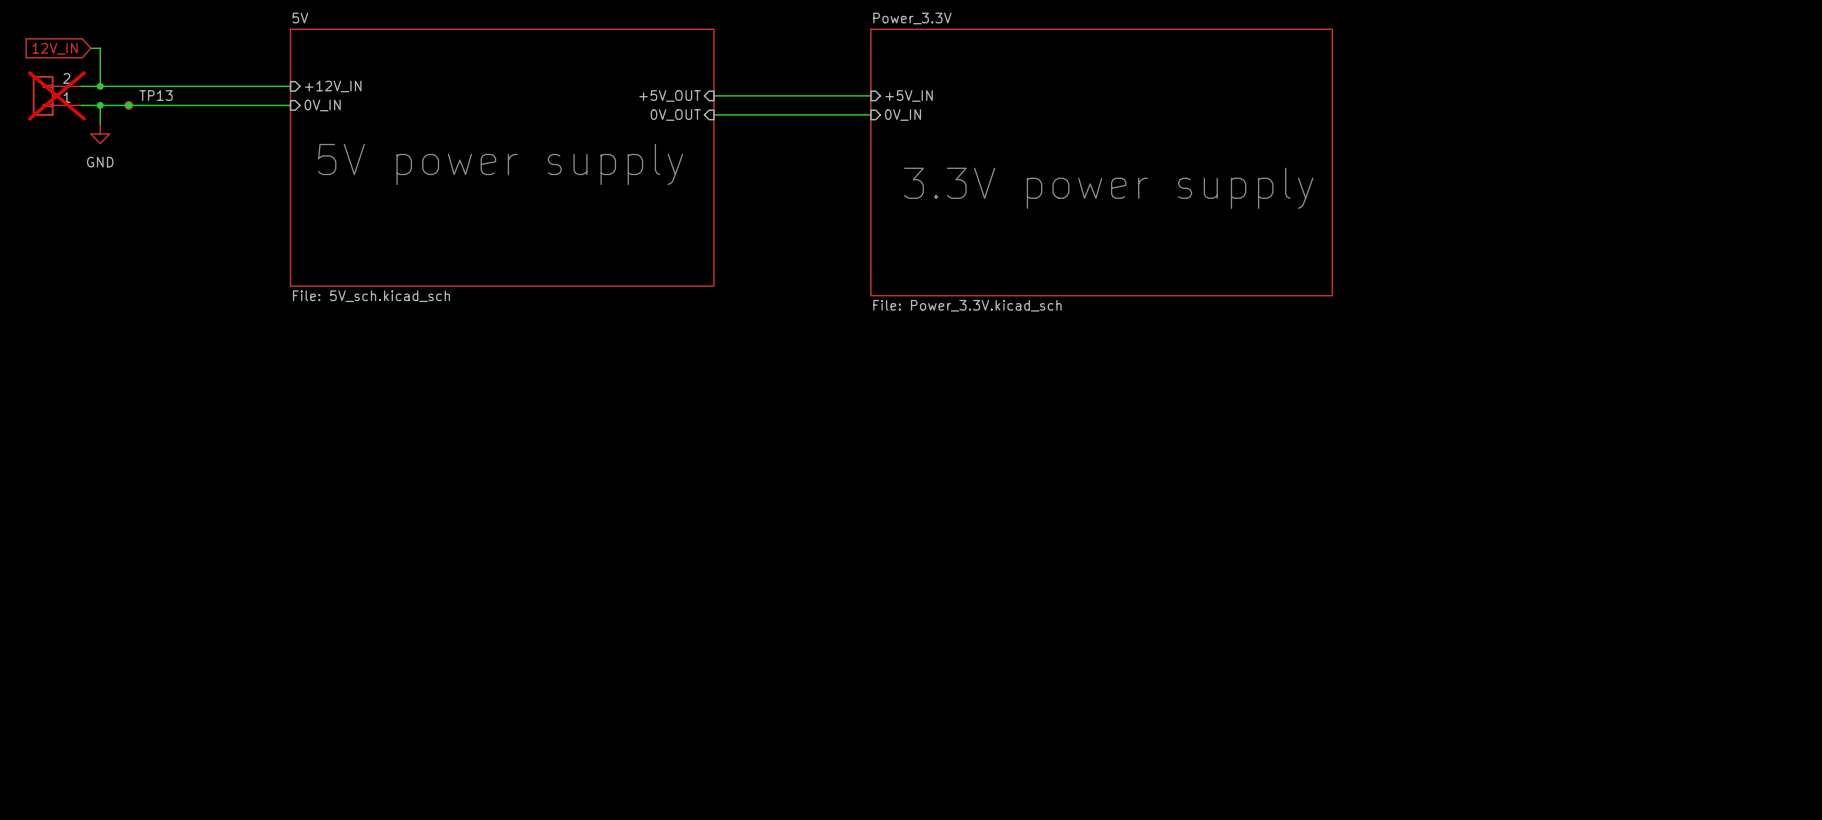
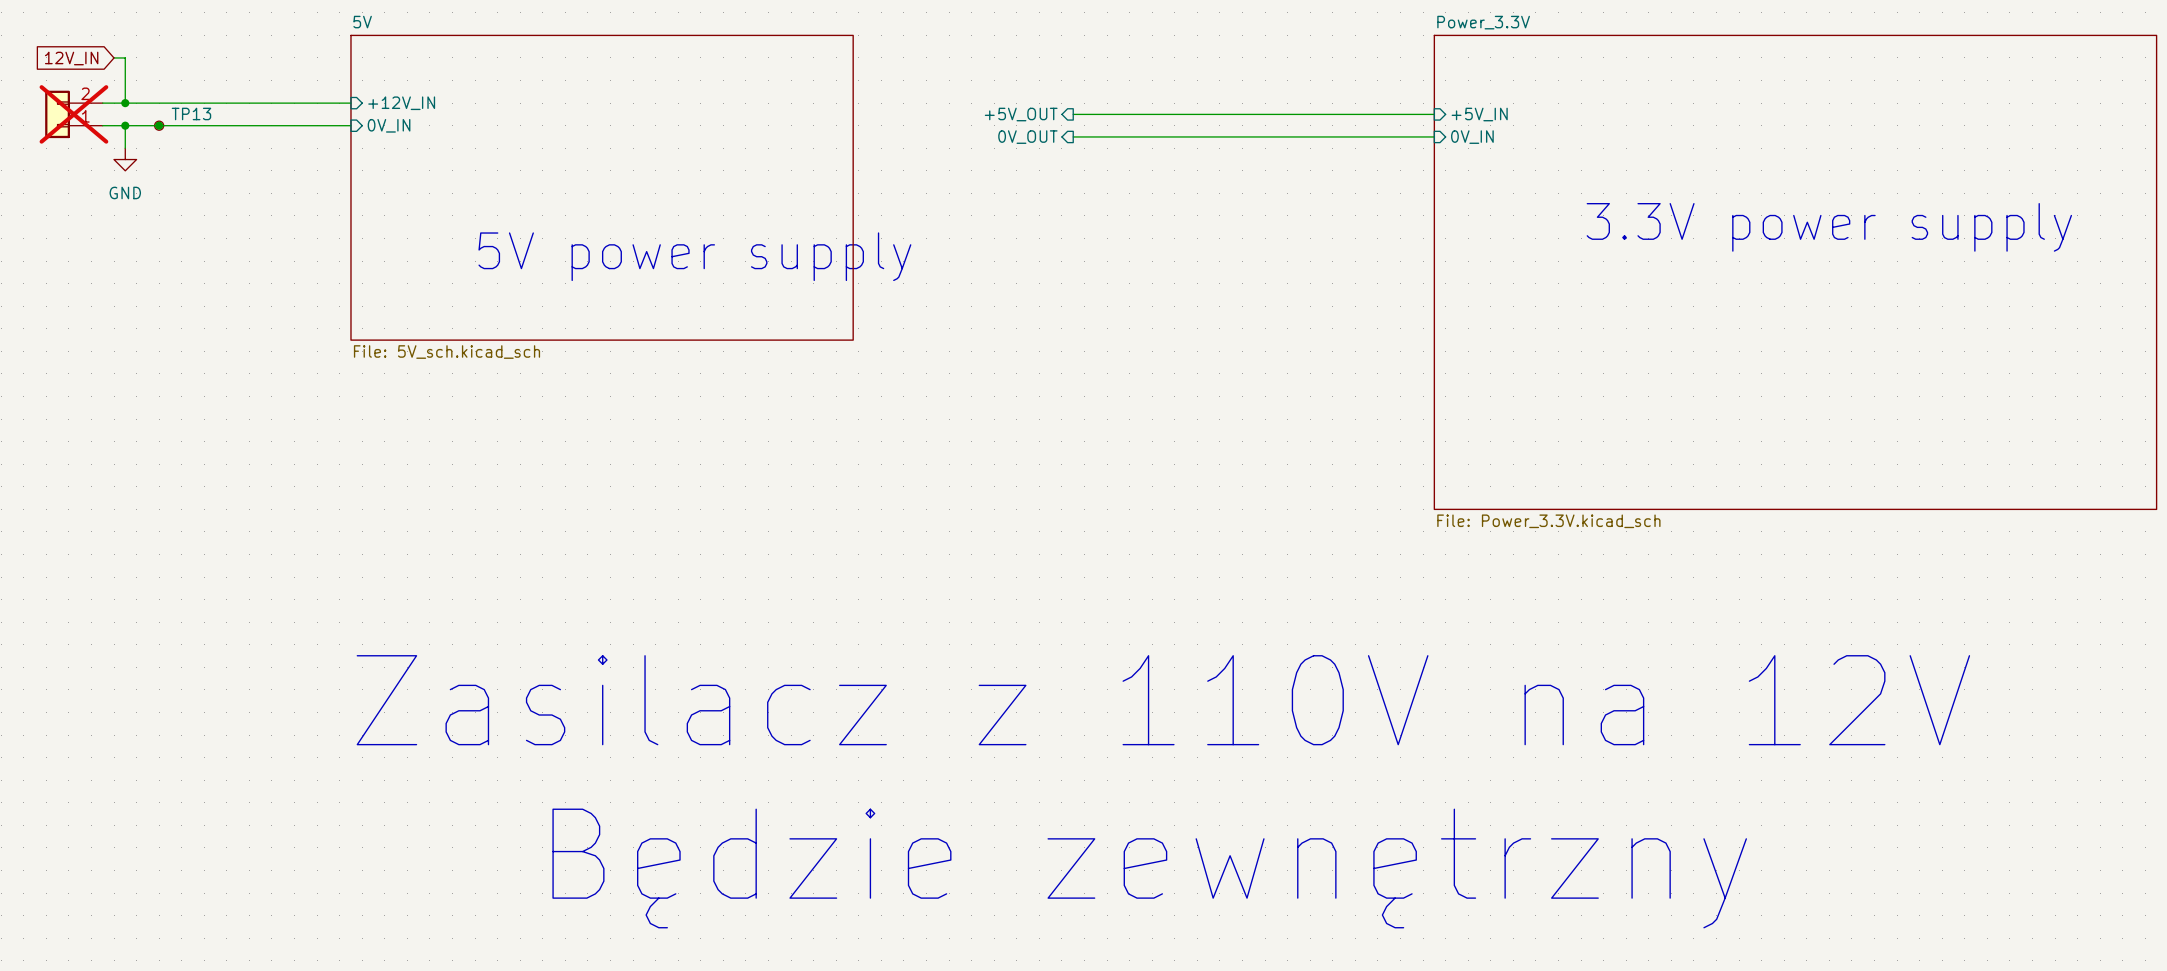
sheet Power_3.3V name position: Power_3.3V (912, 18) -> Power_3.3V (1483, 22)
sheet Power_3.3V shape: [870, 28, 1333, 297] -> [1433, 34, 2158, 511]
sheet pin position: +5V_OUT (670, 95) -> +5V_OUT (1021, 114)
wire: (713, 95) (870, 95) -> none
wire: none -> (1073, 114) (1434, 114)
sheet pin: +5V_IN (909, 95) -> none
sheet pin: none -> +5V_IN (1479, 114)
wire: (713, 114) (870, 114) -> none
wire: none -> (1073, 136) (1434, 136)
sheet pin position: 0V_OUT (675, 115) -> 0V_OUT (1027, 137)
sheet pin: 0V_IN (902, 115) -> none
sheet pin: none -> 0V_IN (1472, 137)
text position: 5V power supply (500, 164) -> 5V power supply (694, 256)
text: 3.3V power supply (1108, 188) -> none
text: none -> 3.3V power supply (1829, 227)
sheet Power_3.3V value position: File: Power_3.3V.kicad_sch (967, 305) -> File: Power_3.3V.kicad_sch (1548, 521)
text: none -> Zasilacz z 110V na 12V (1163, 700)
text: none -> Będzie zewnętrzny (1149, 868)

